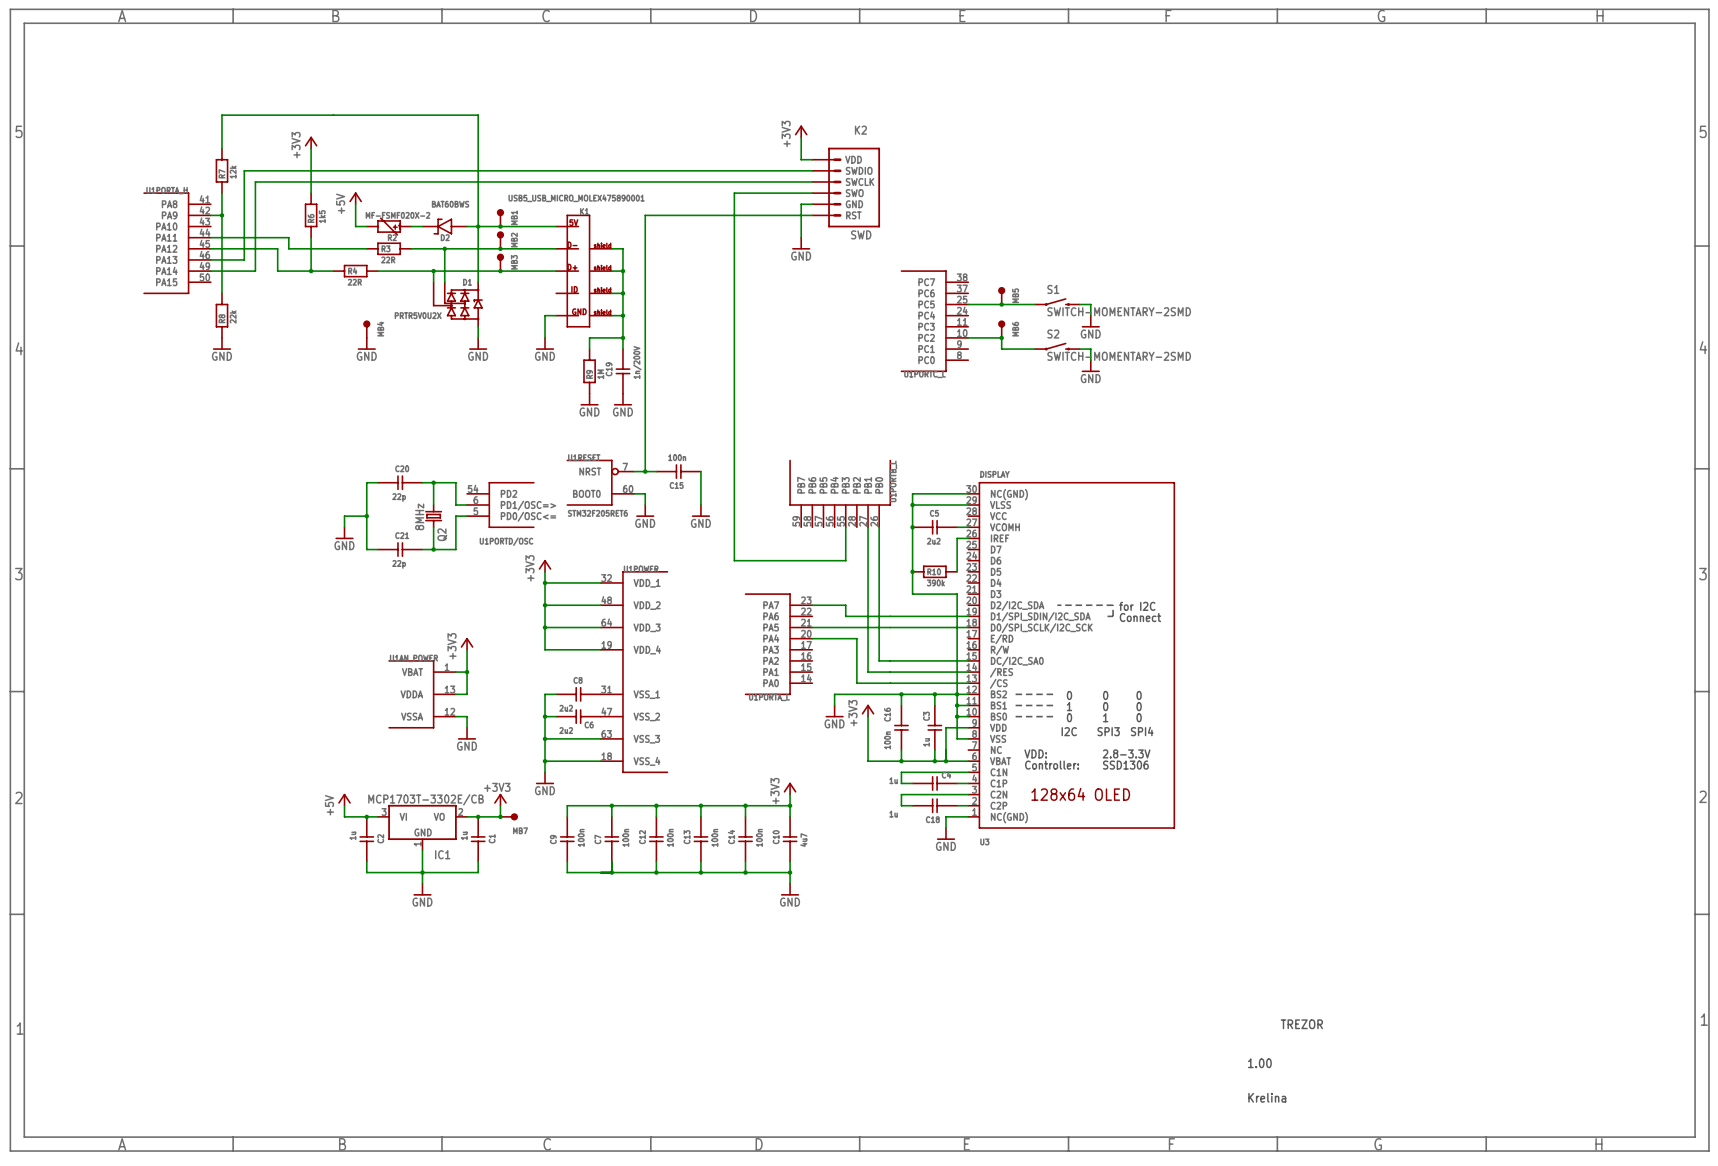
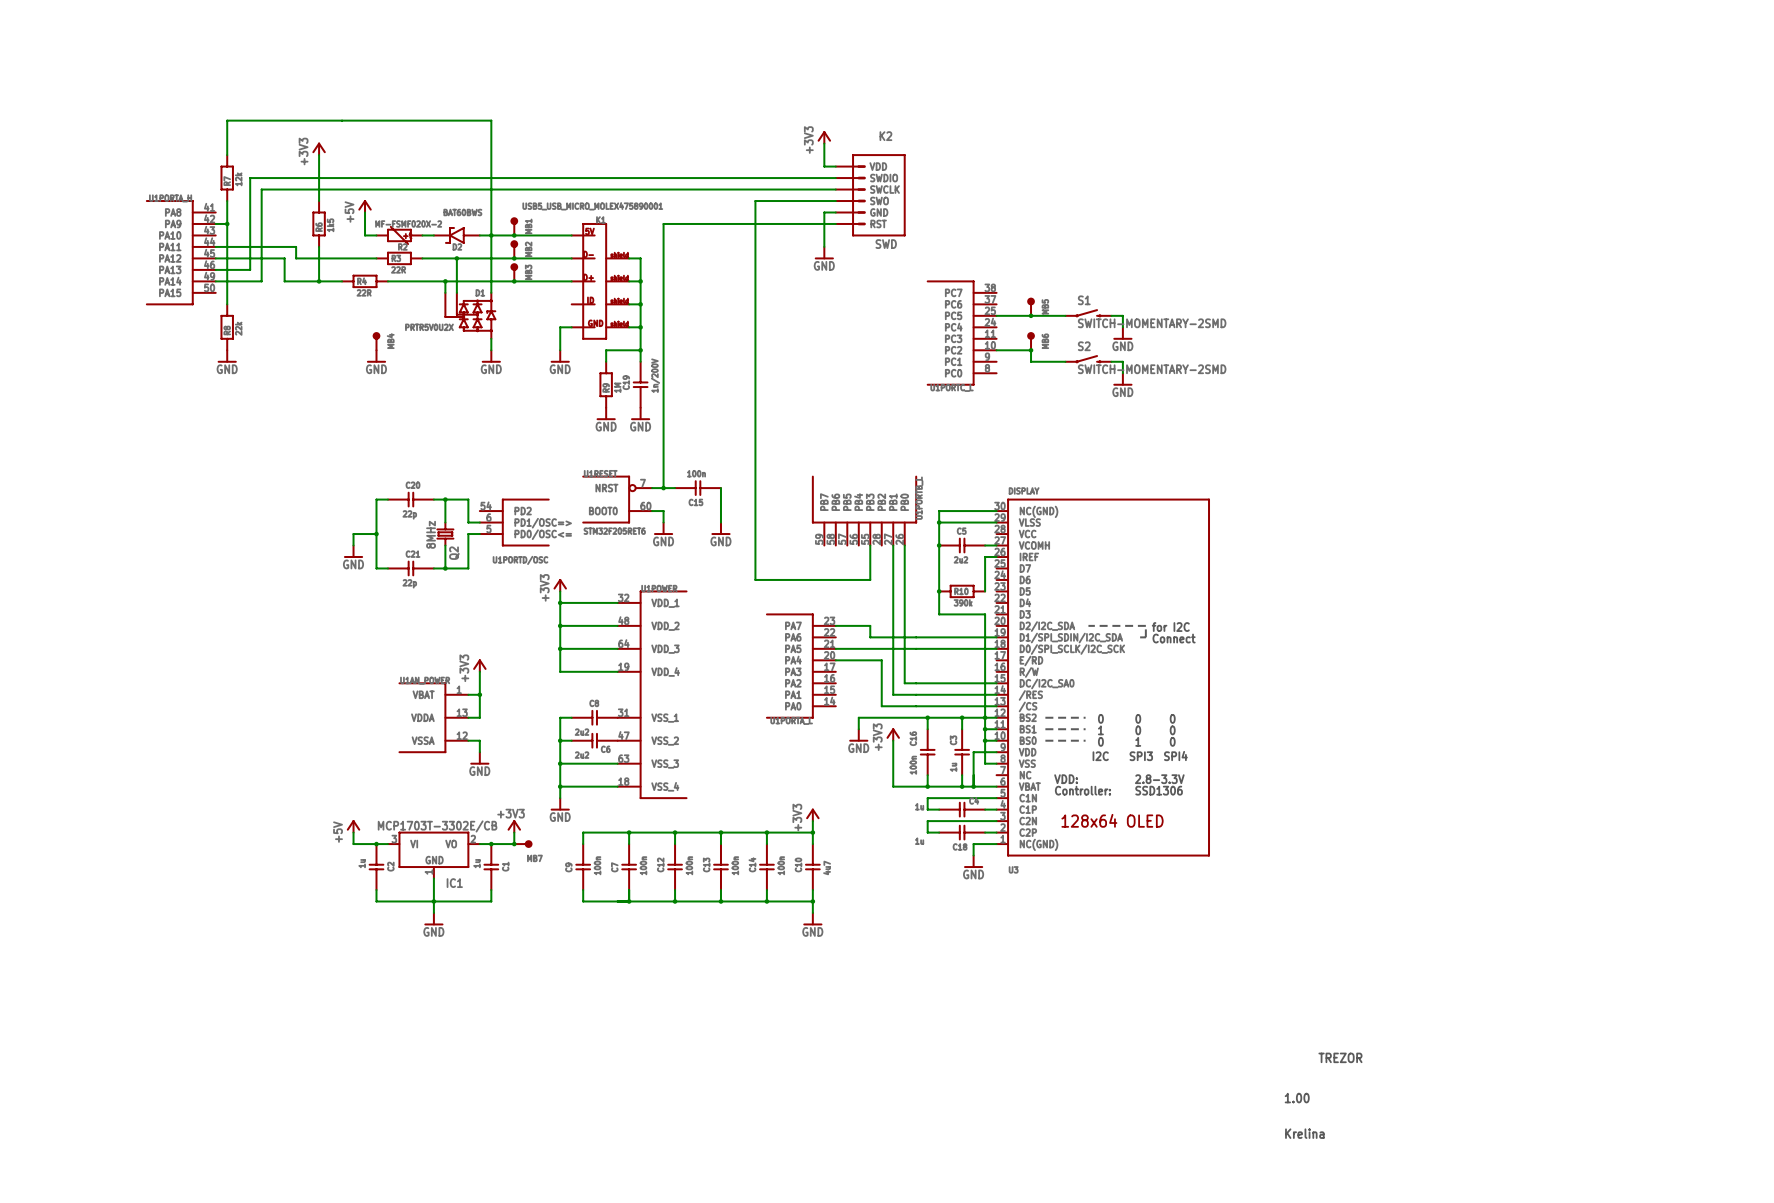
part: (859, 580) -> none

